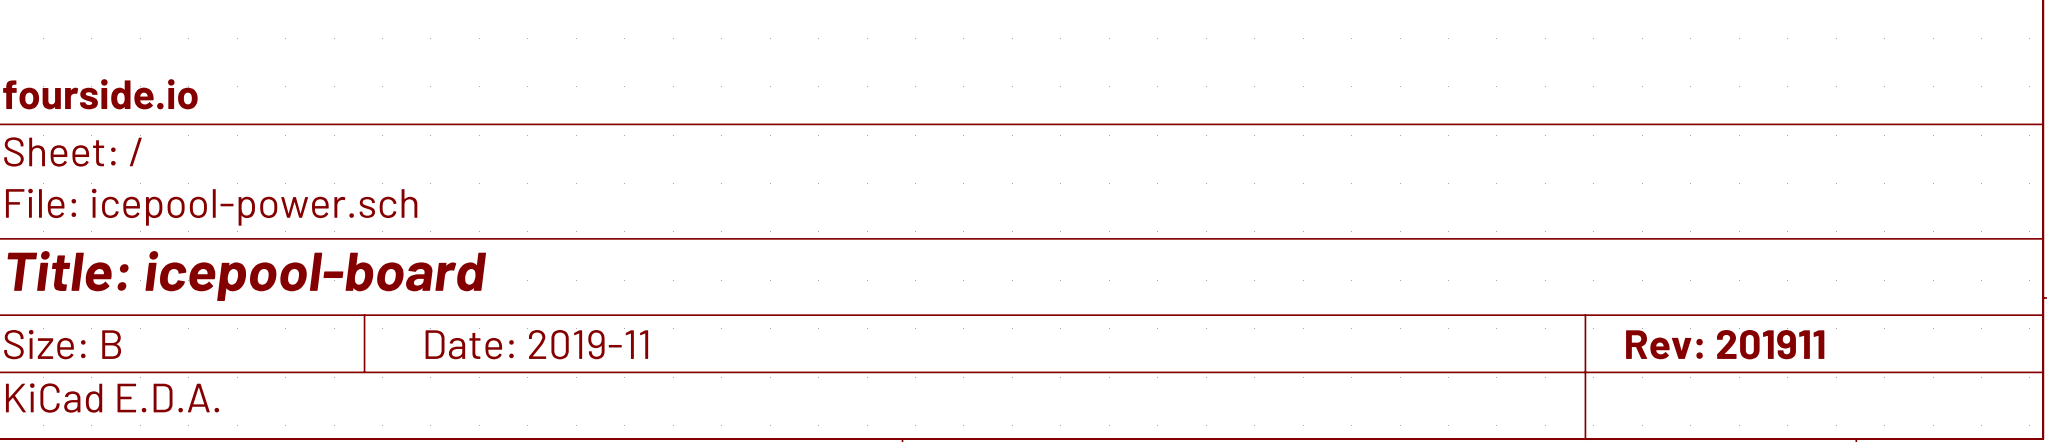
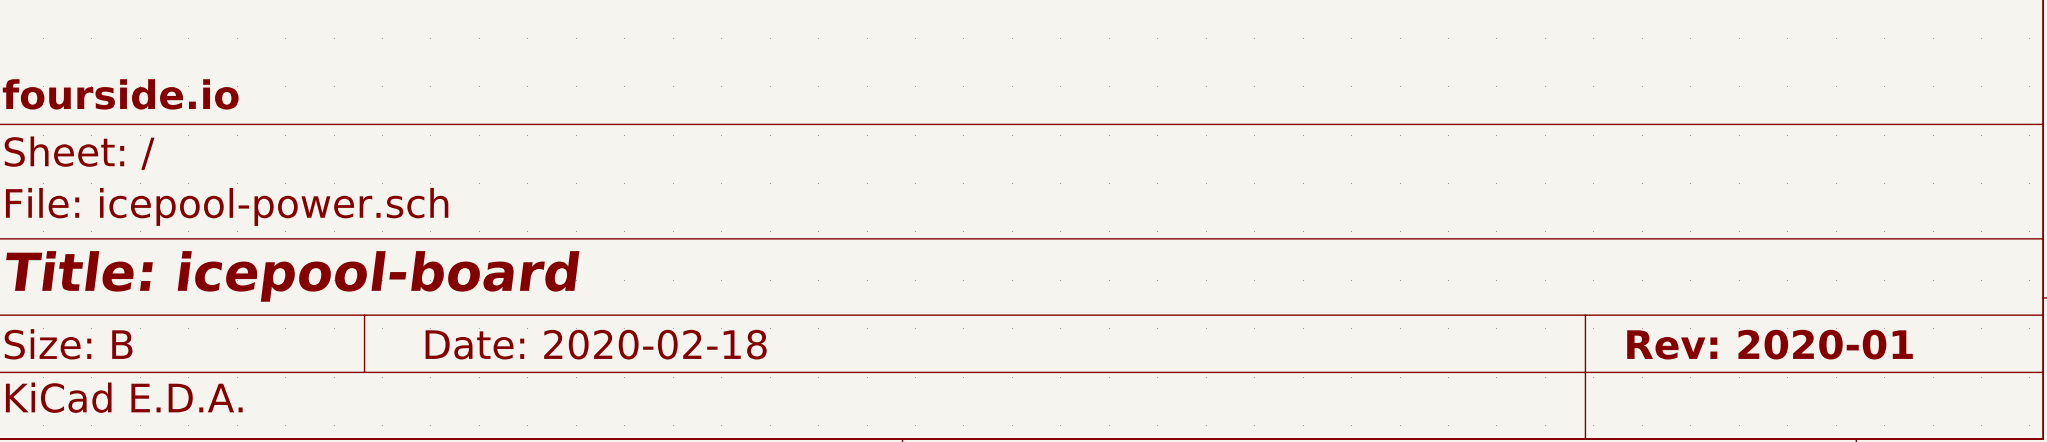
title block: Date: 2019-11 (536, 344) -> Date: 2020-02-18 (596, 344)
title block: Rev: 201911 (1725, 344) -> Rev: 2020-01 (1770, 344)

